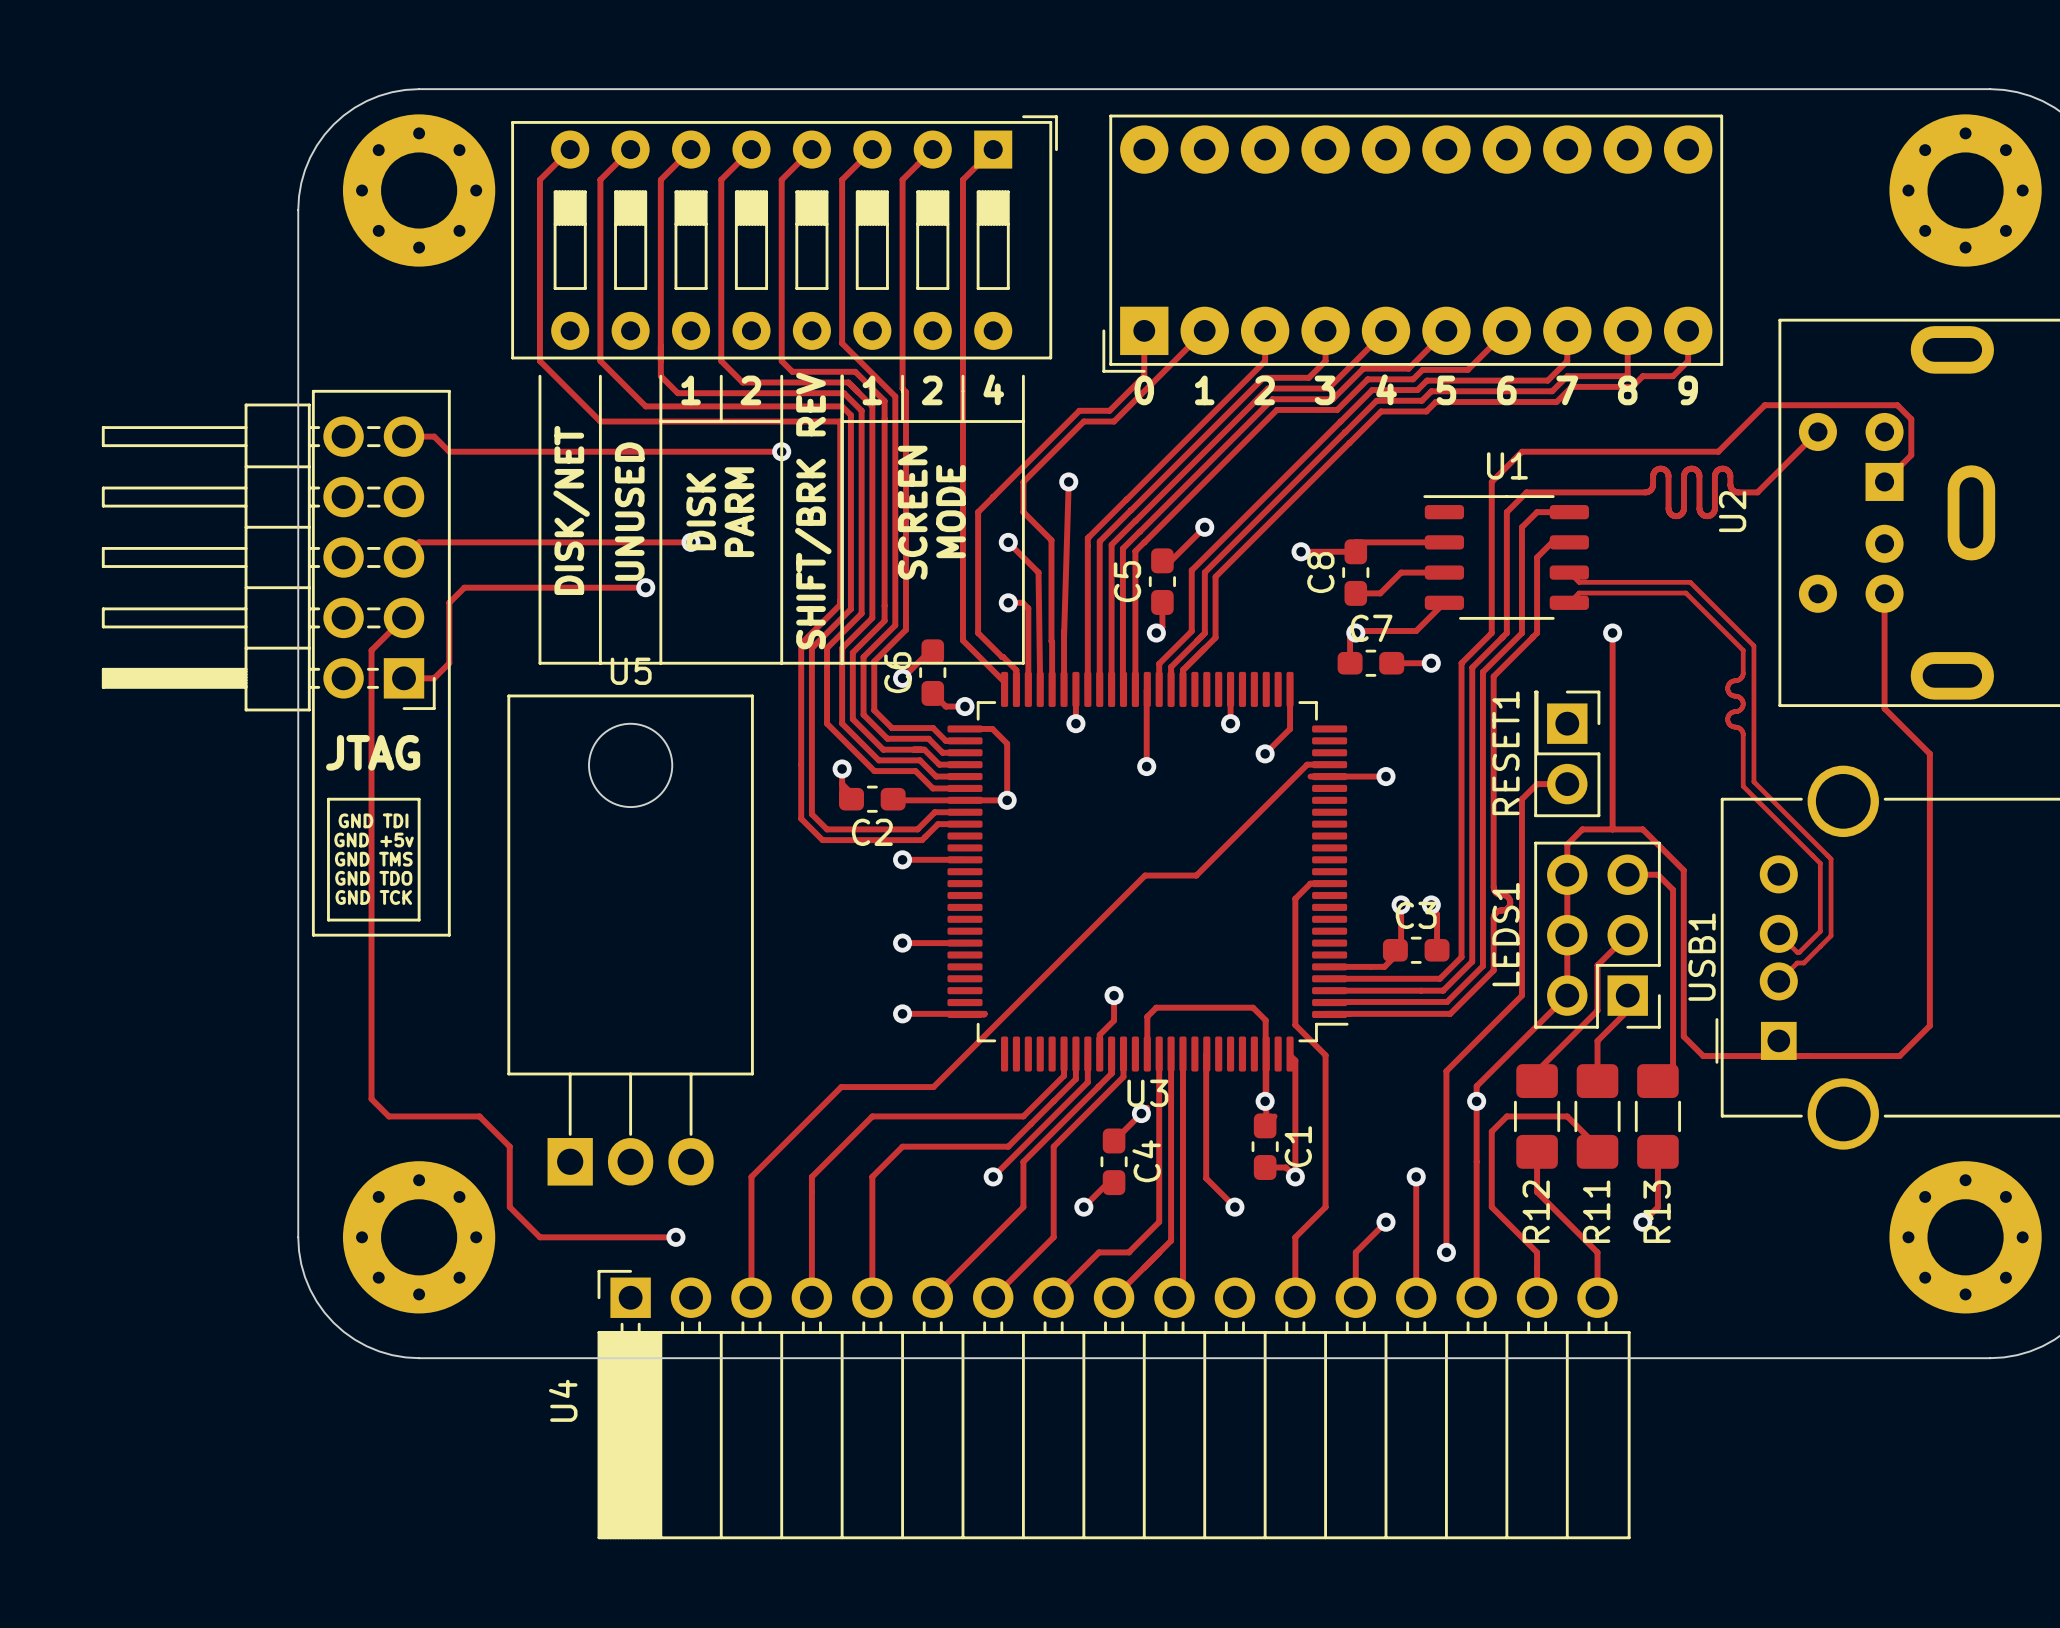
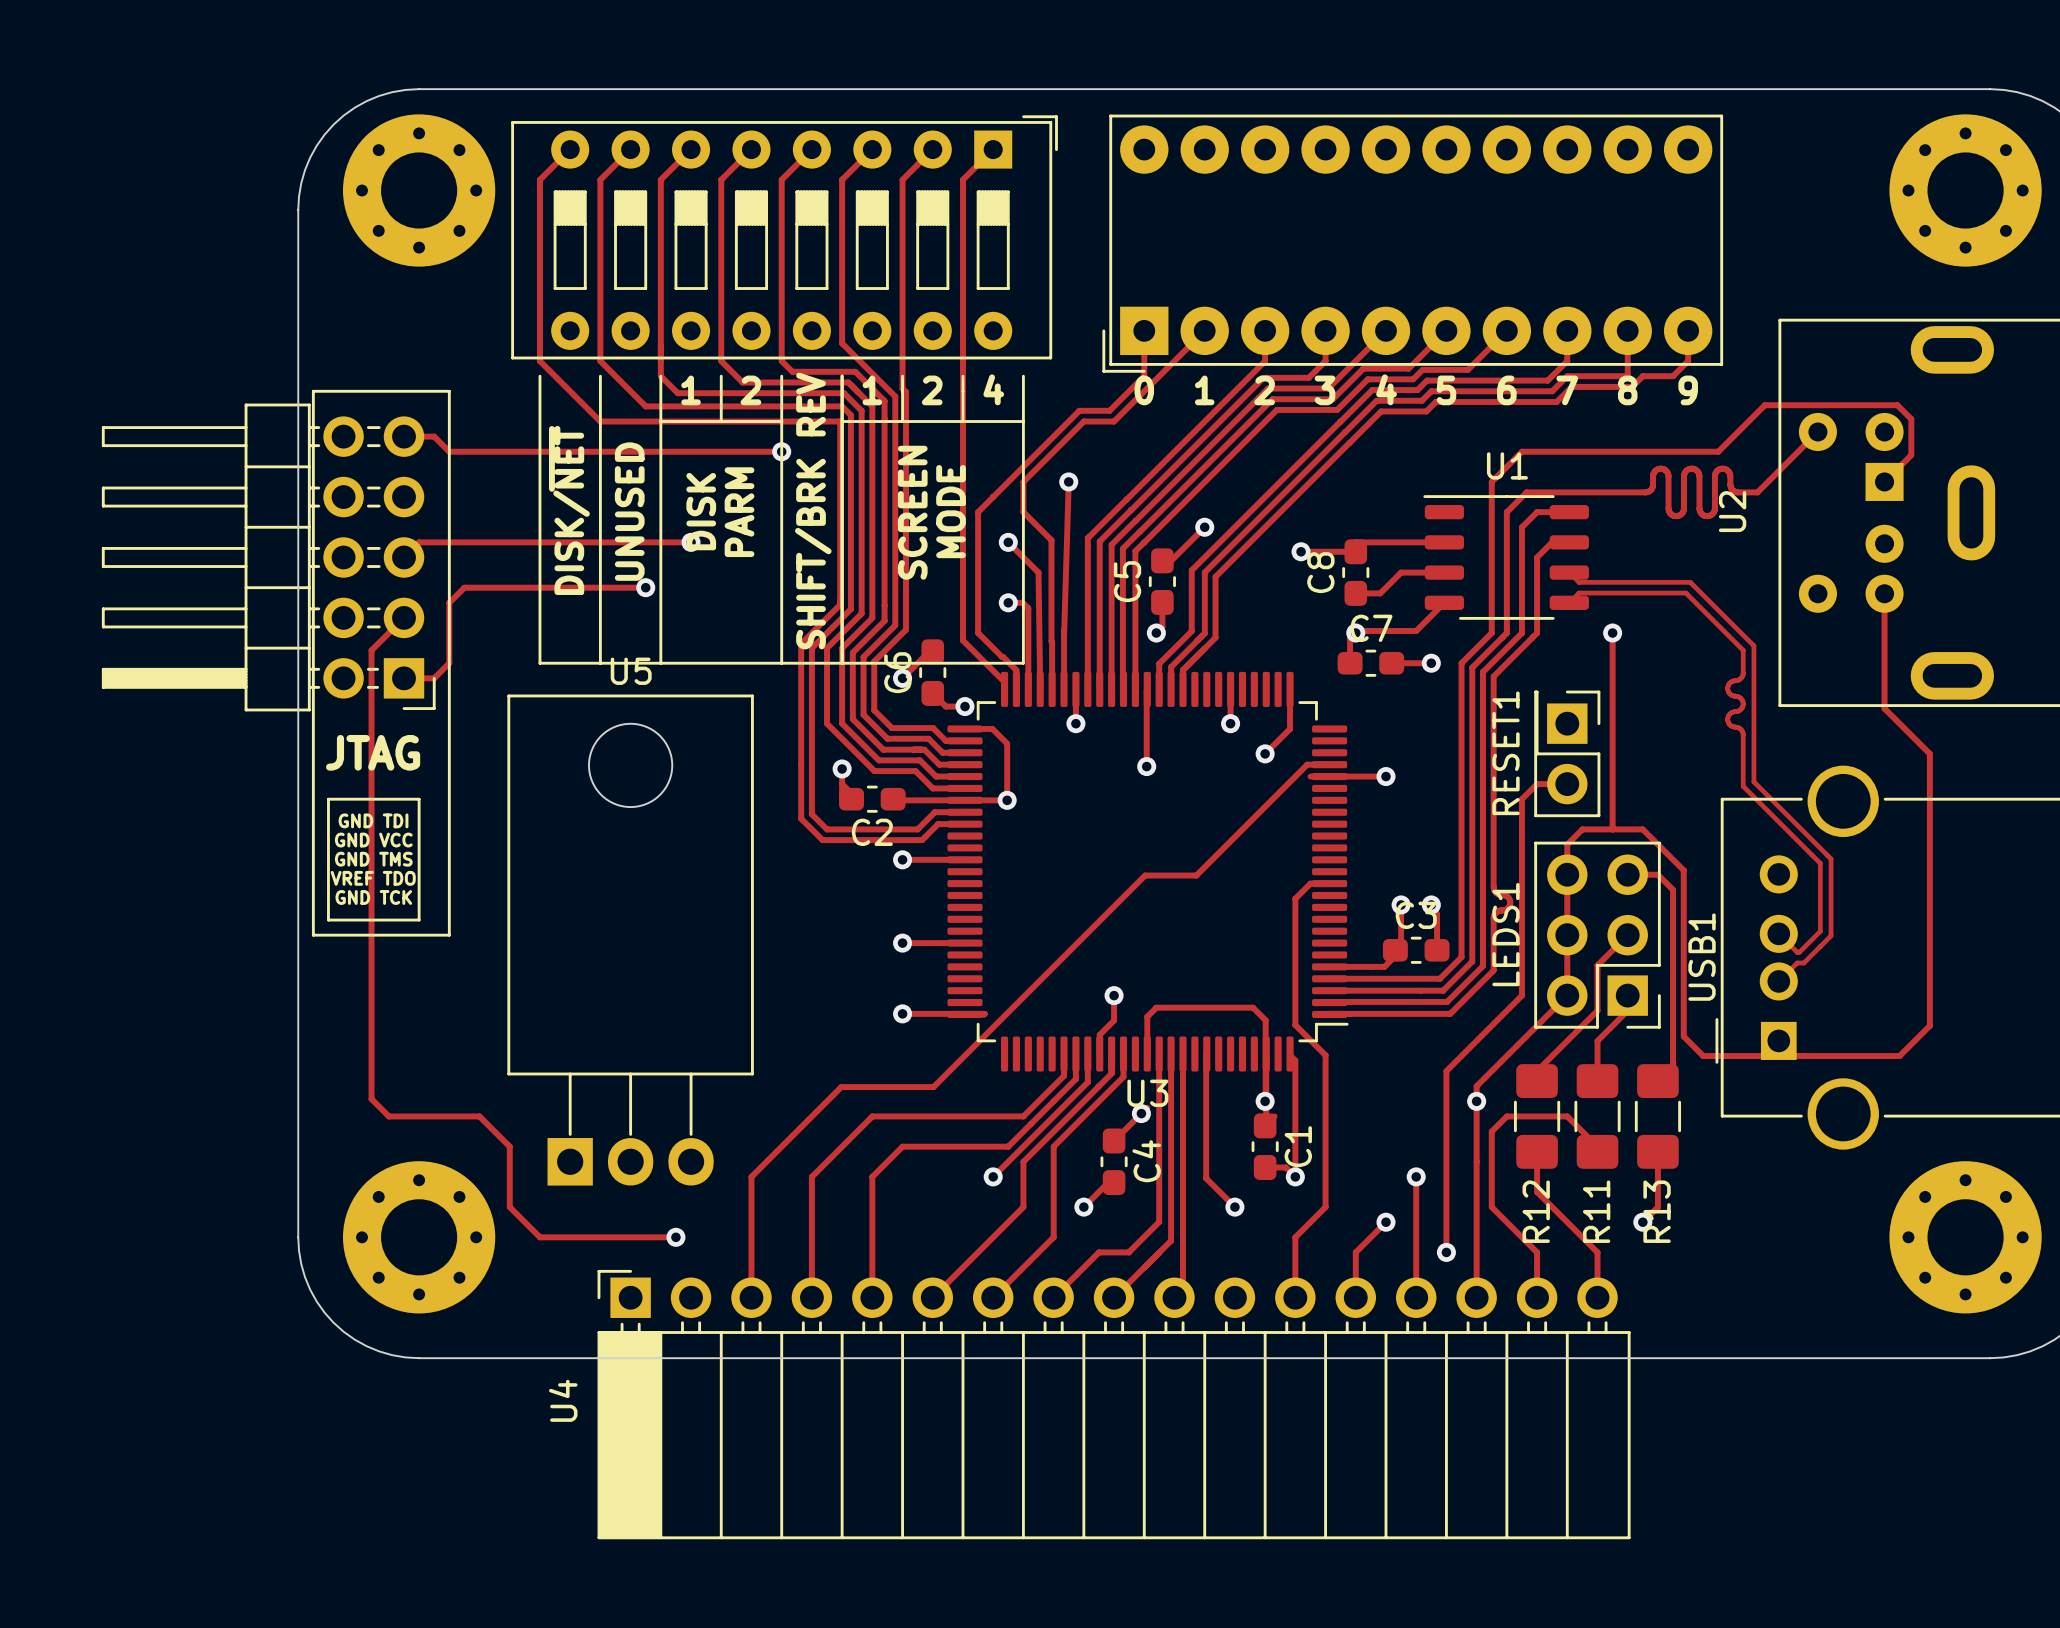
text: DISK/NET (571, 510) -> DISK/~{NET} (569, 510)
text: GND +5v (374, 840) -> GND VCC (373, 840)
text: GND TDO (373, 878) -> VREF TDO (373, 878)

